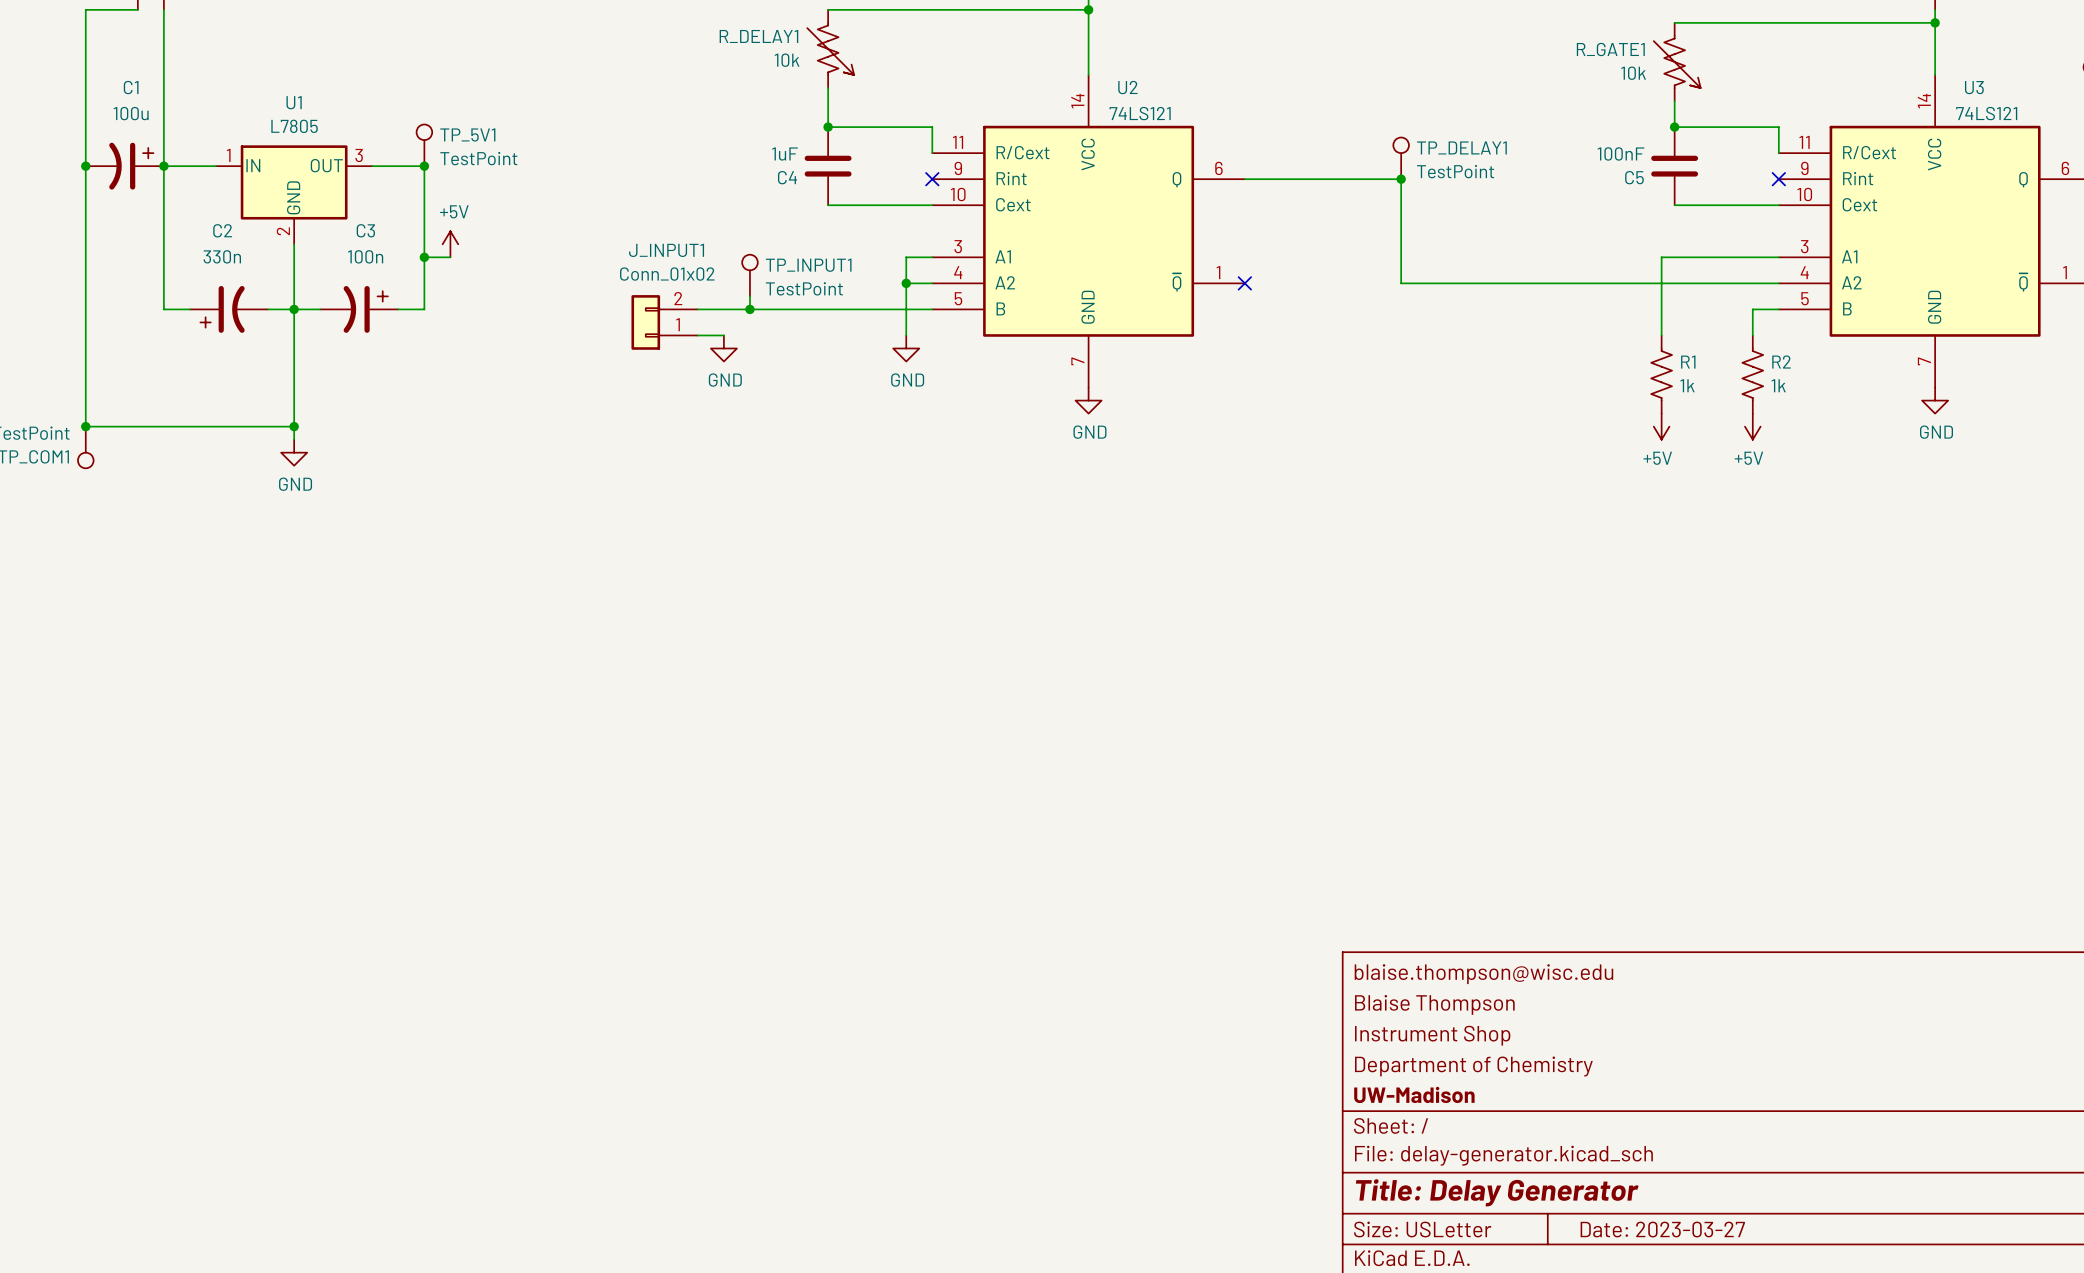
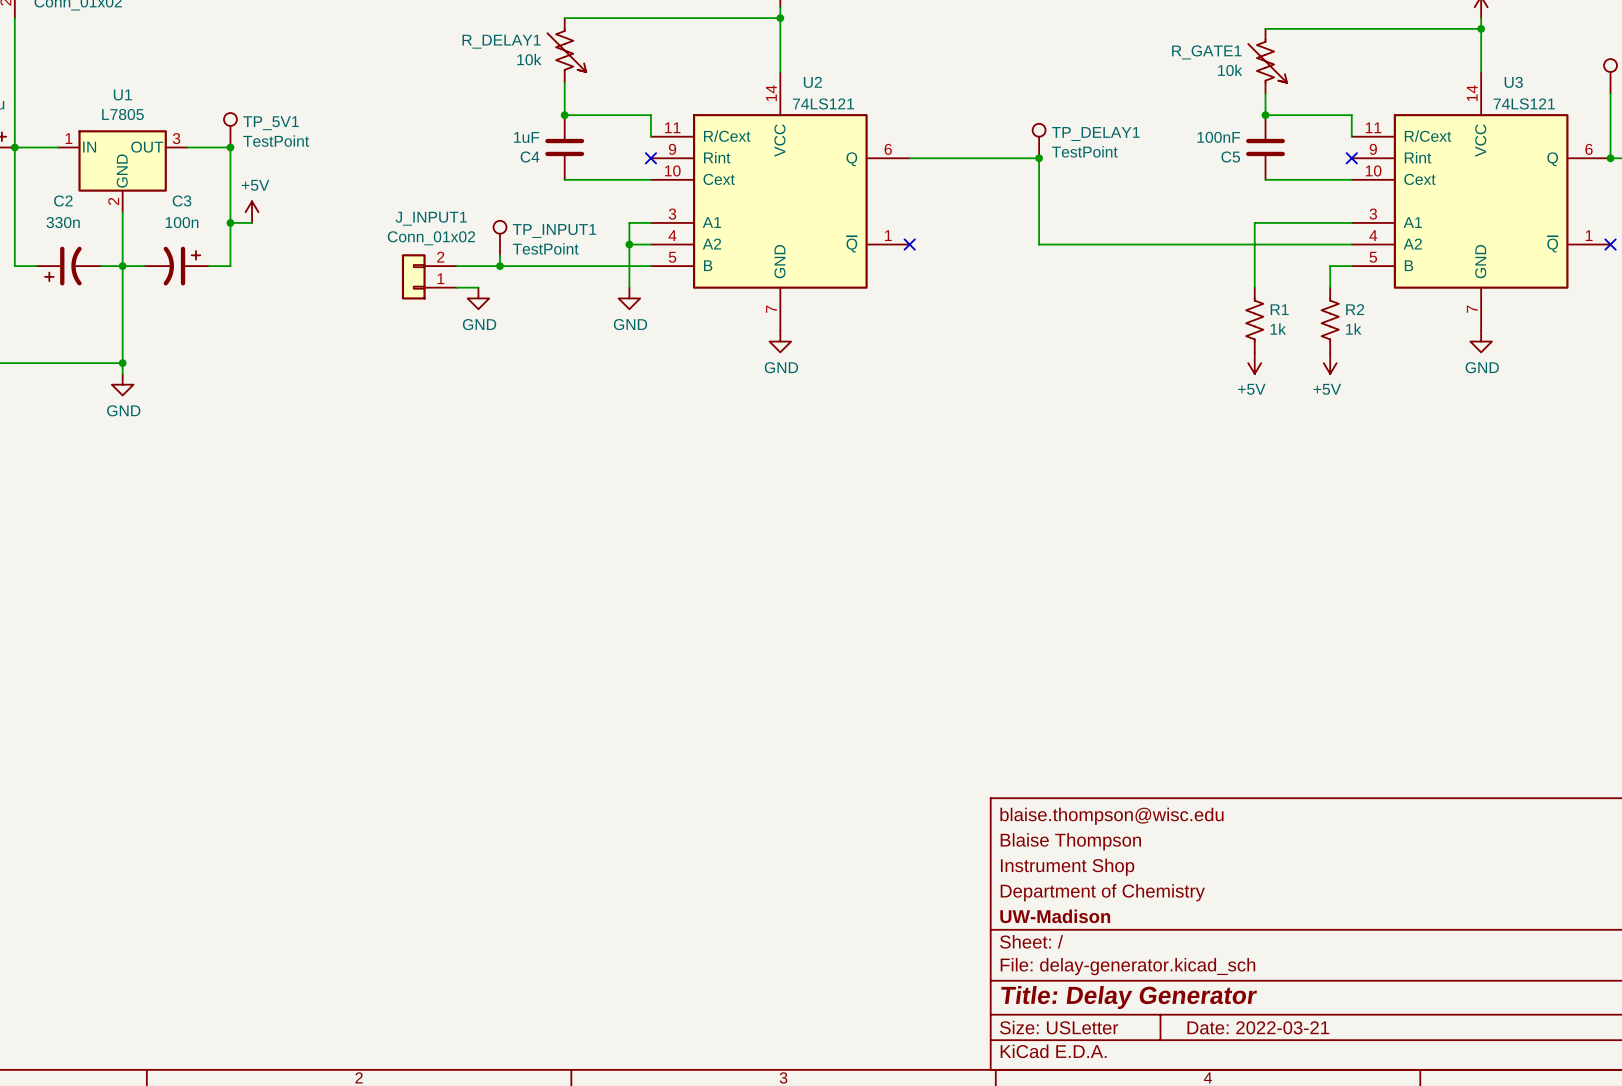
title block: Date: 2023-03-27 (1662, 1229) -> Date: 2022-03-21 (1258, 1027)

